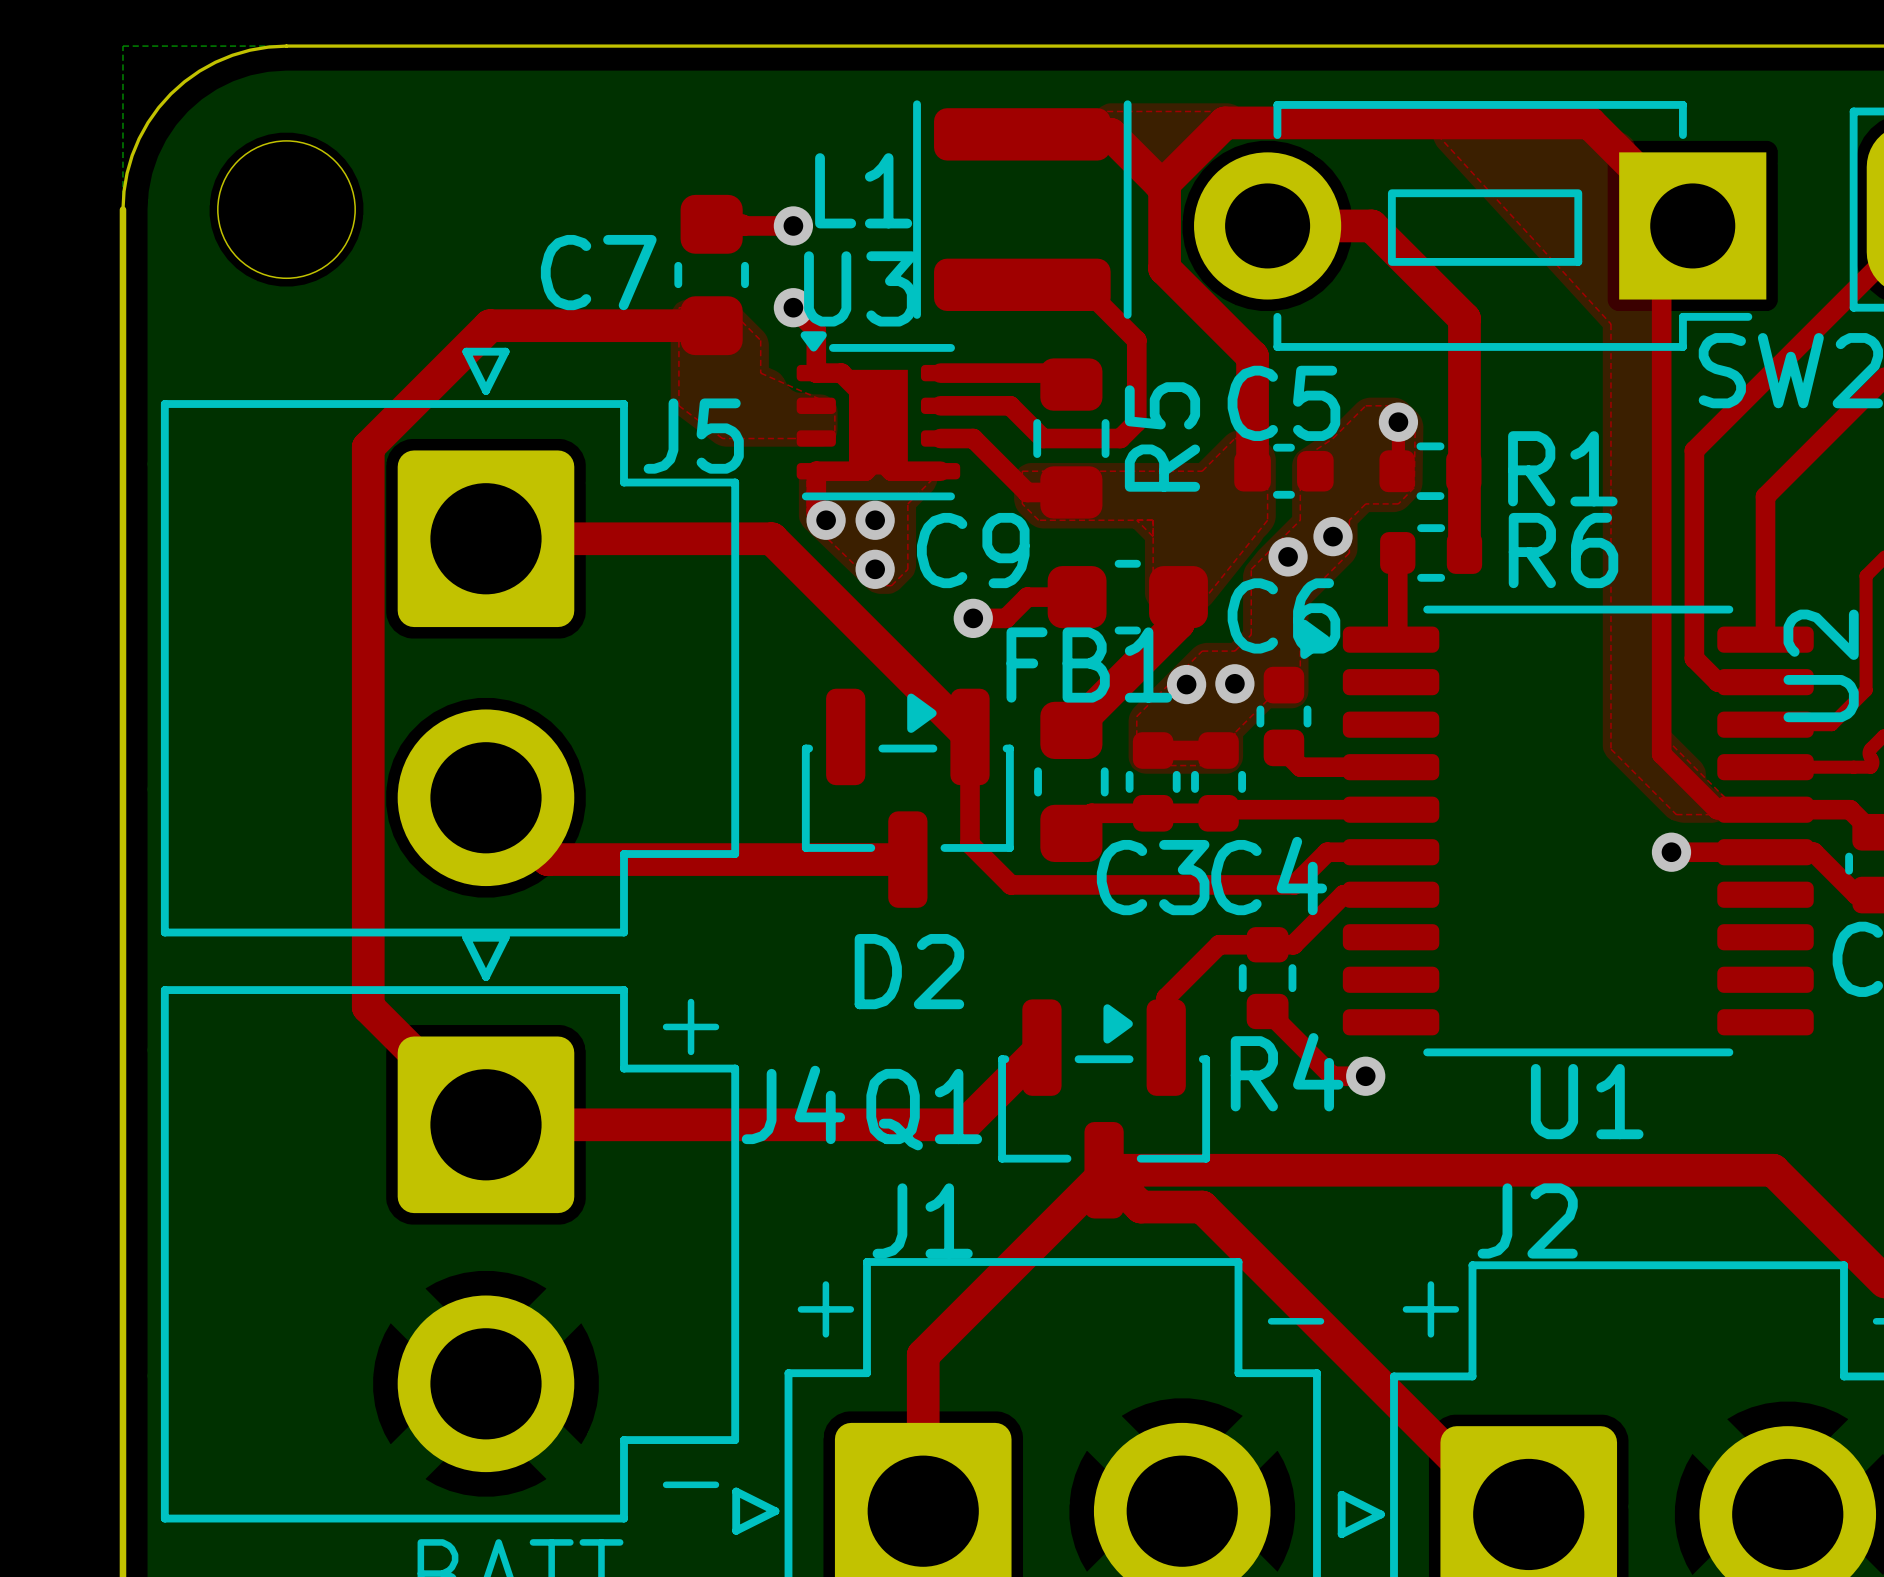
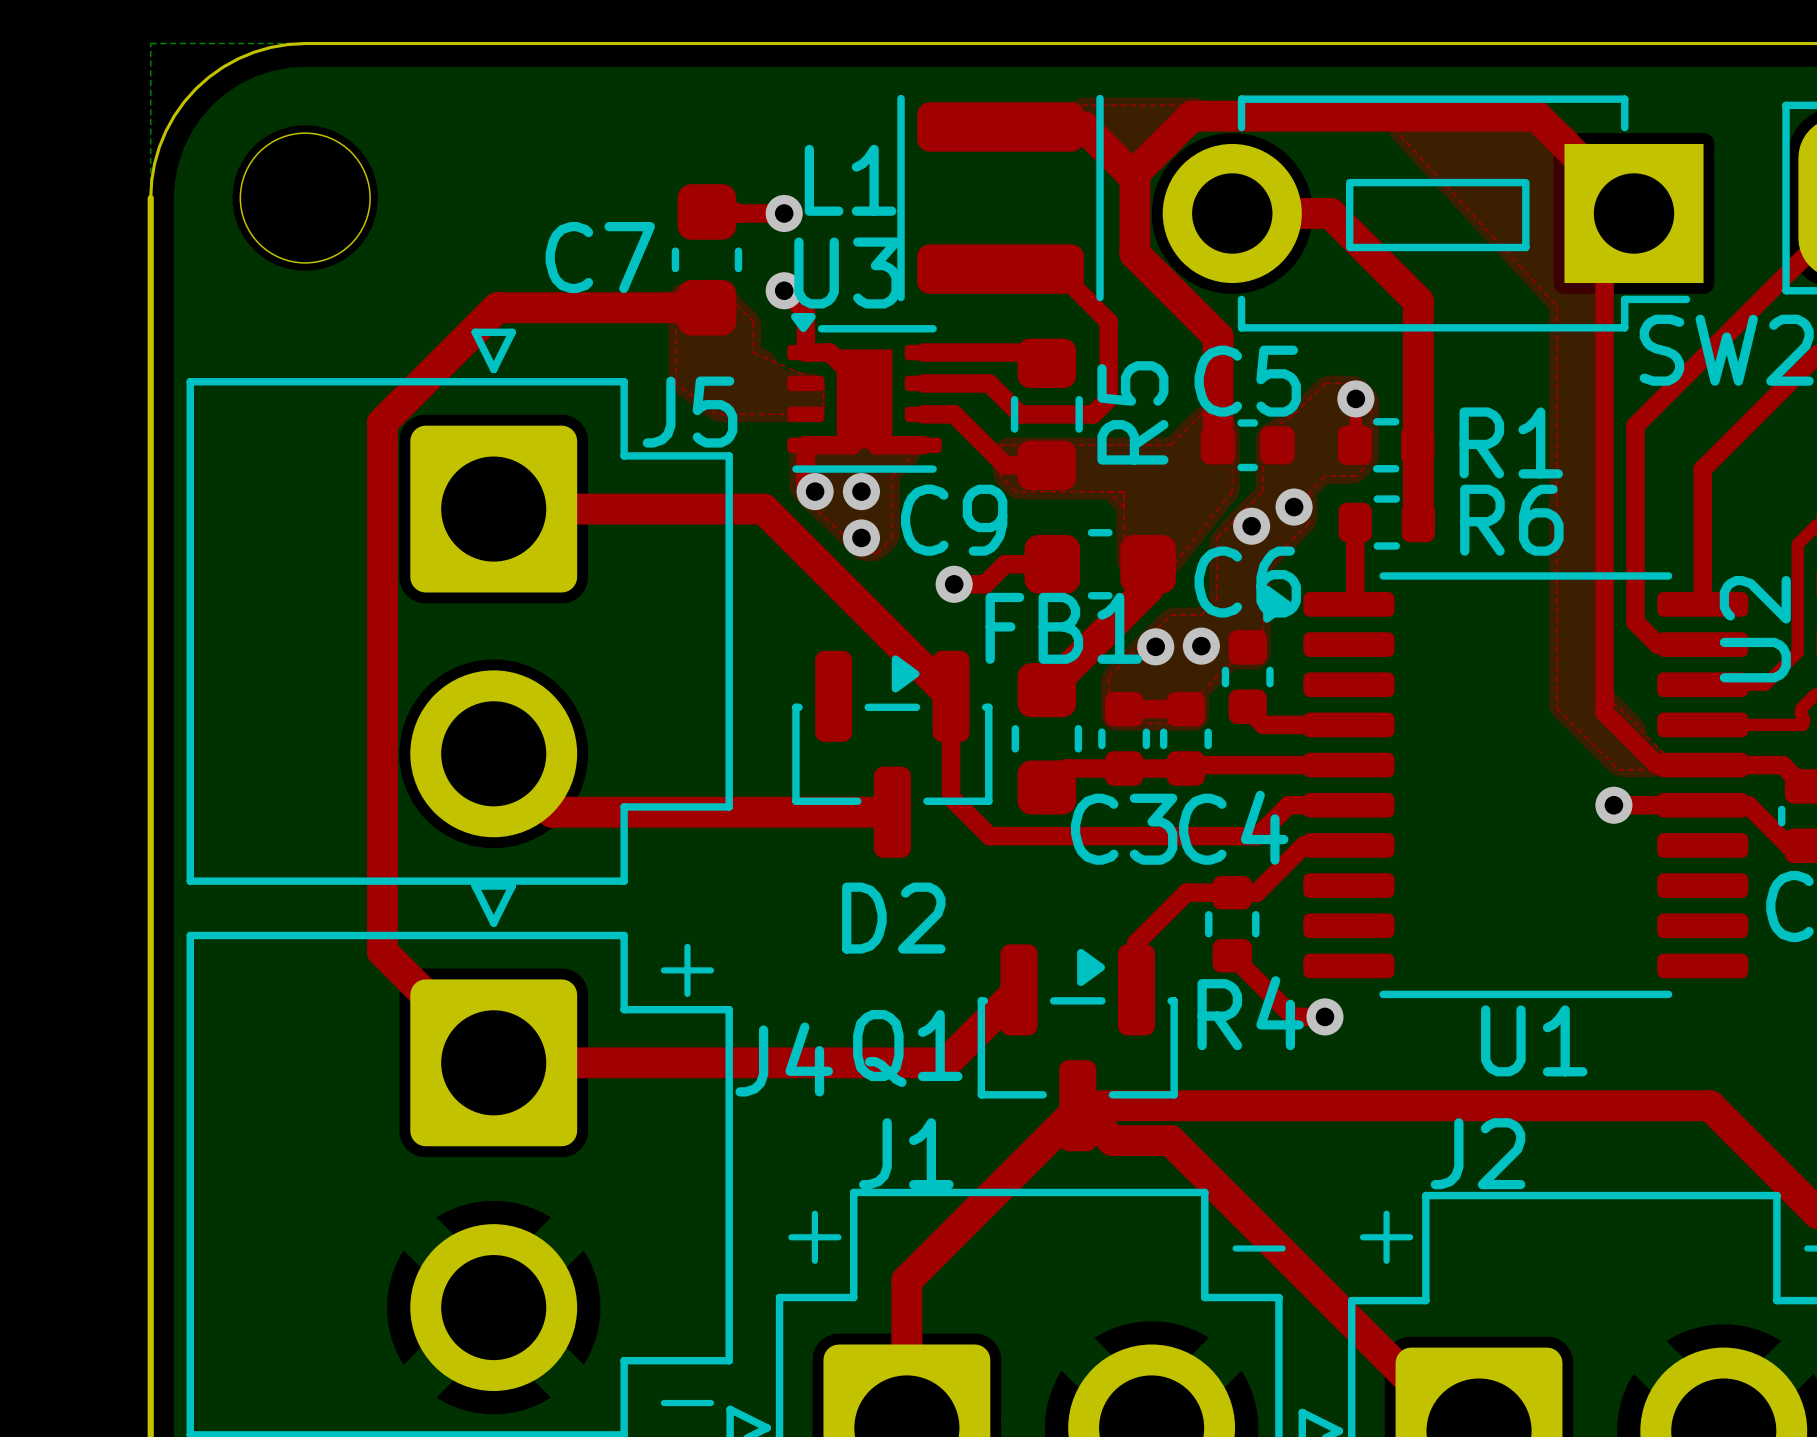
J4 name position: J4 (793, 1104) -> J4 (784, 1059)

